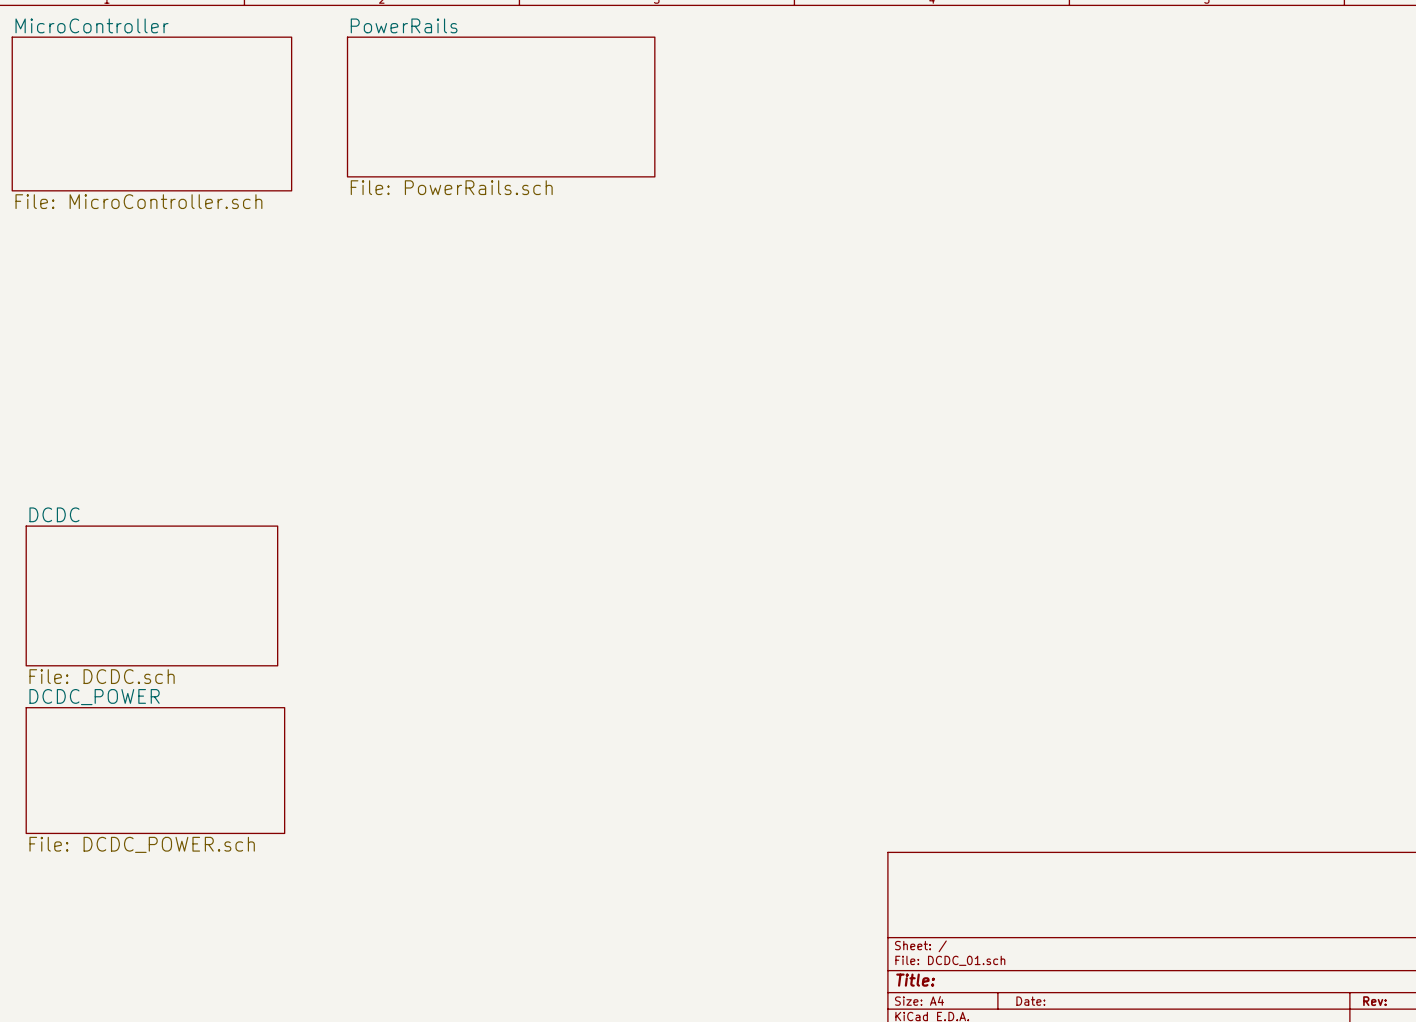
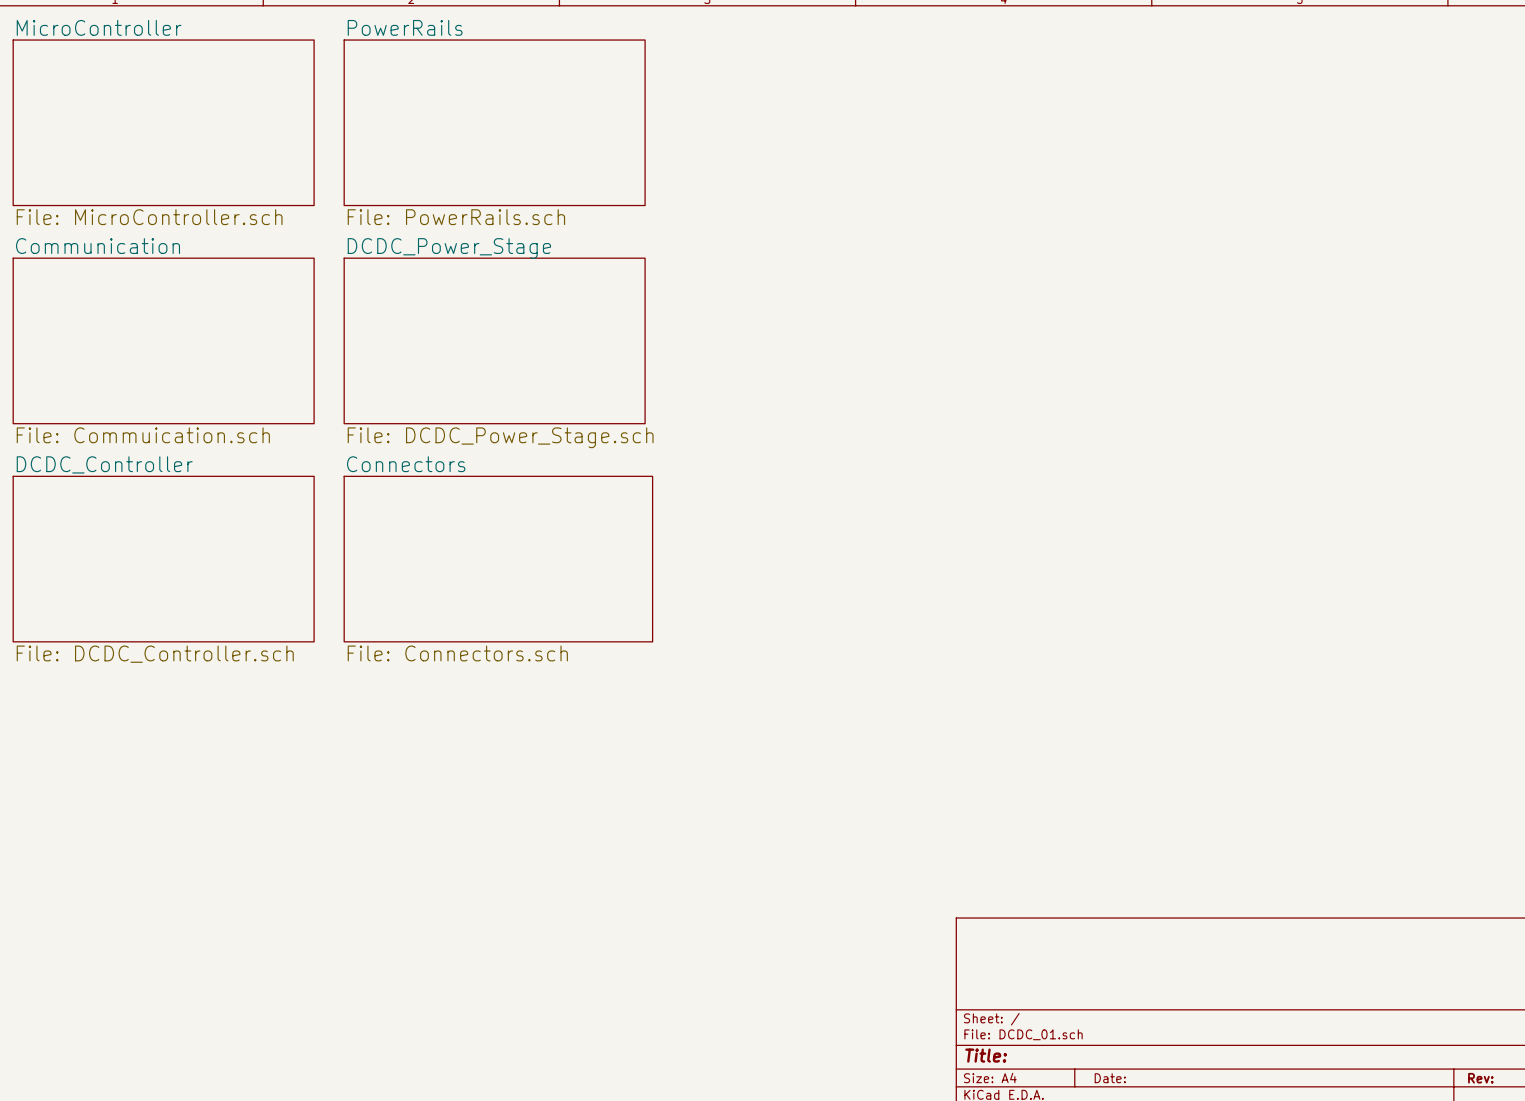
sheet PowerRails: File: PowerRails.sch (501, 107) -> none
sheet PowerRails: none -> File: PowerRails.sch (494, 122)
sheet Communication: none -> File: Commuication.sch (163, 340)
sheet DCDC_Power_Stage: none -> File: DCDC_Power_Stage.sch (494, 340)
sheet DCDC_Controller: none -> File: DCDC_Controller.sch (163, 559)
sheet Connectors: none -> File: Connectors.sch (498, 559)
sheet DCDC: File: DCDC.sch (151, 595) -> none
sheet DCDC_POWER: File: DCDC_POWER.sch (155, 770) -> none

